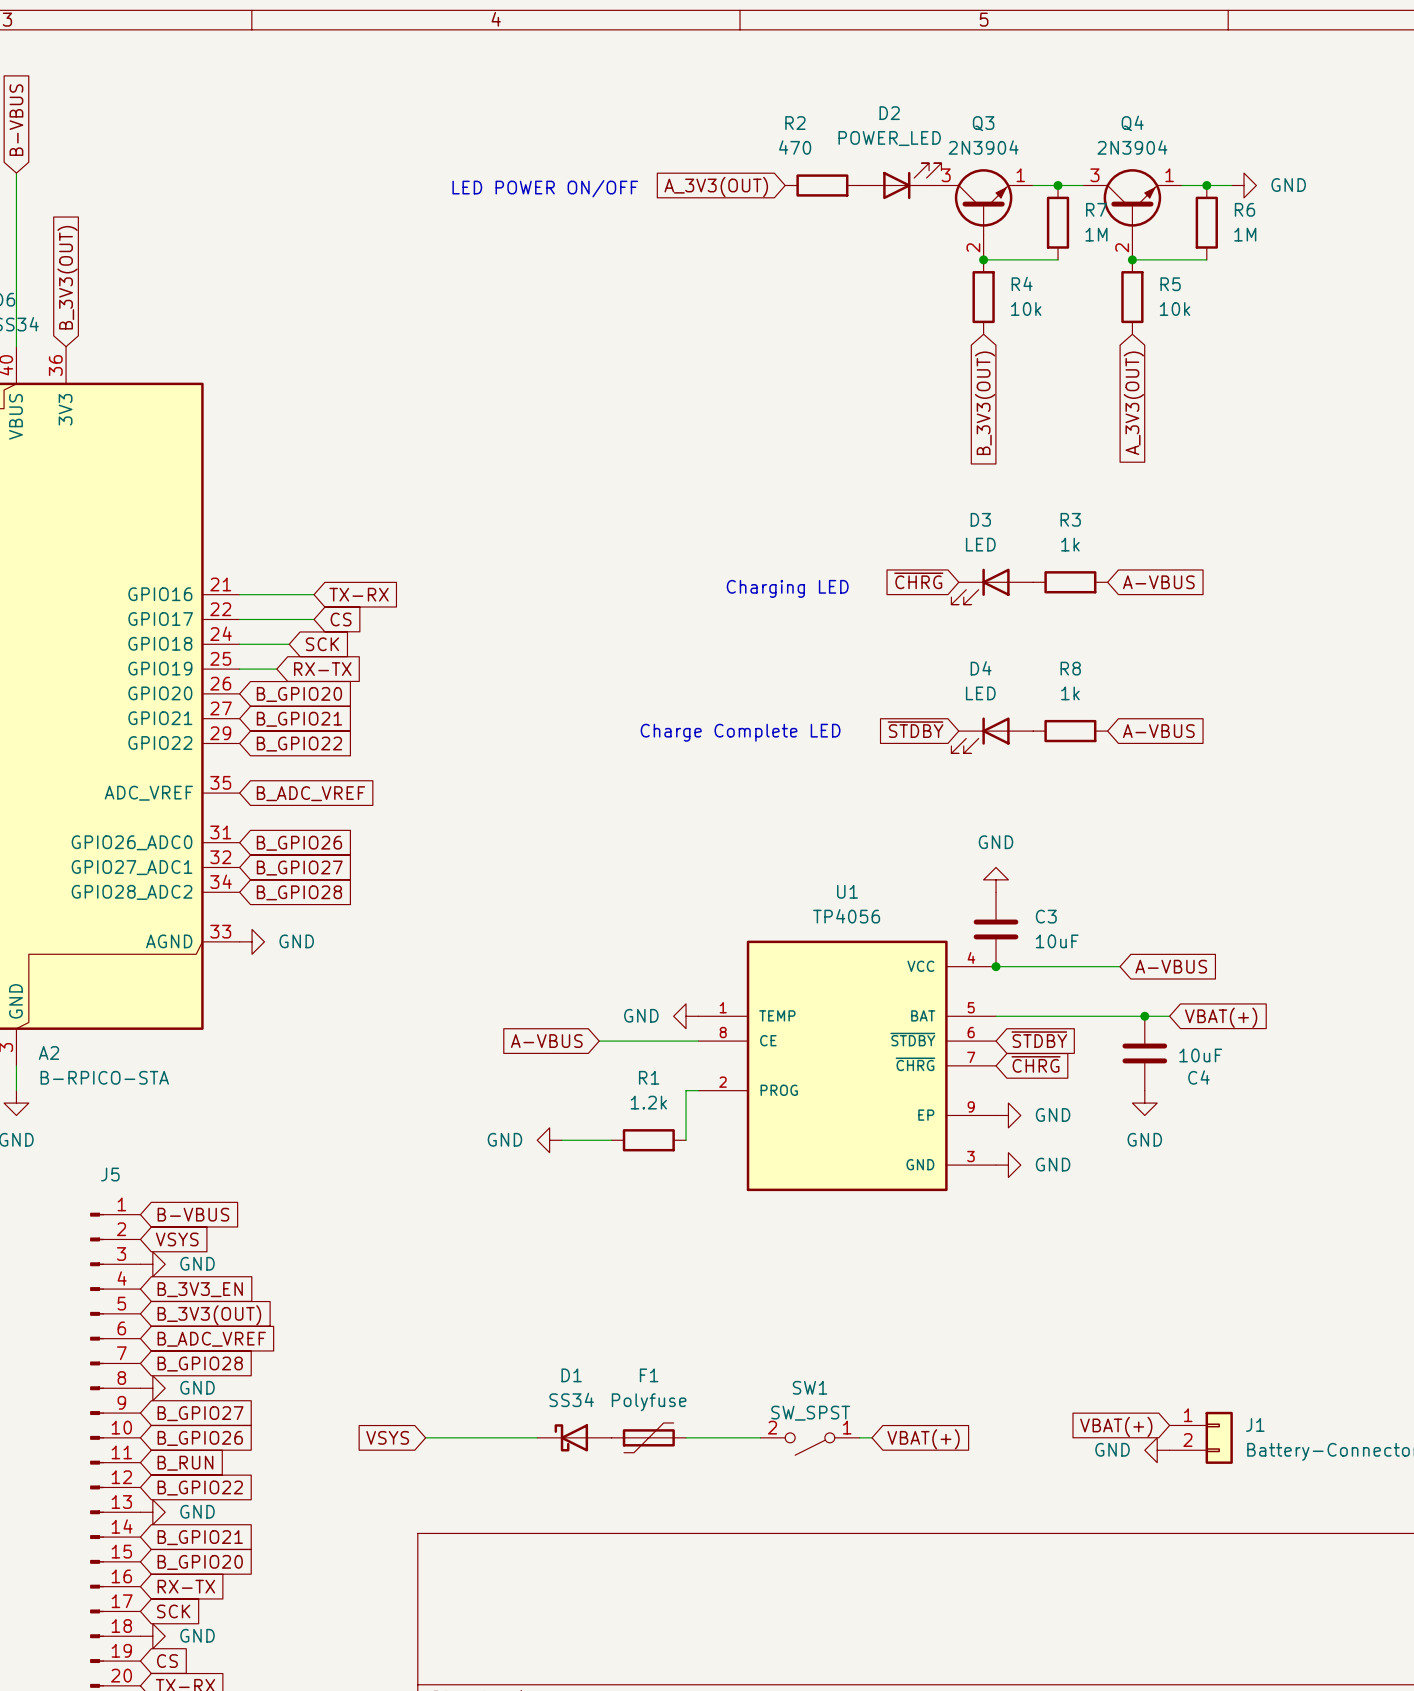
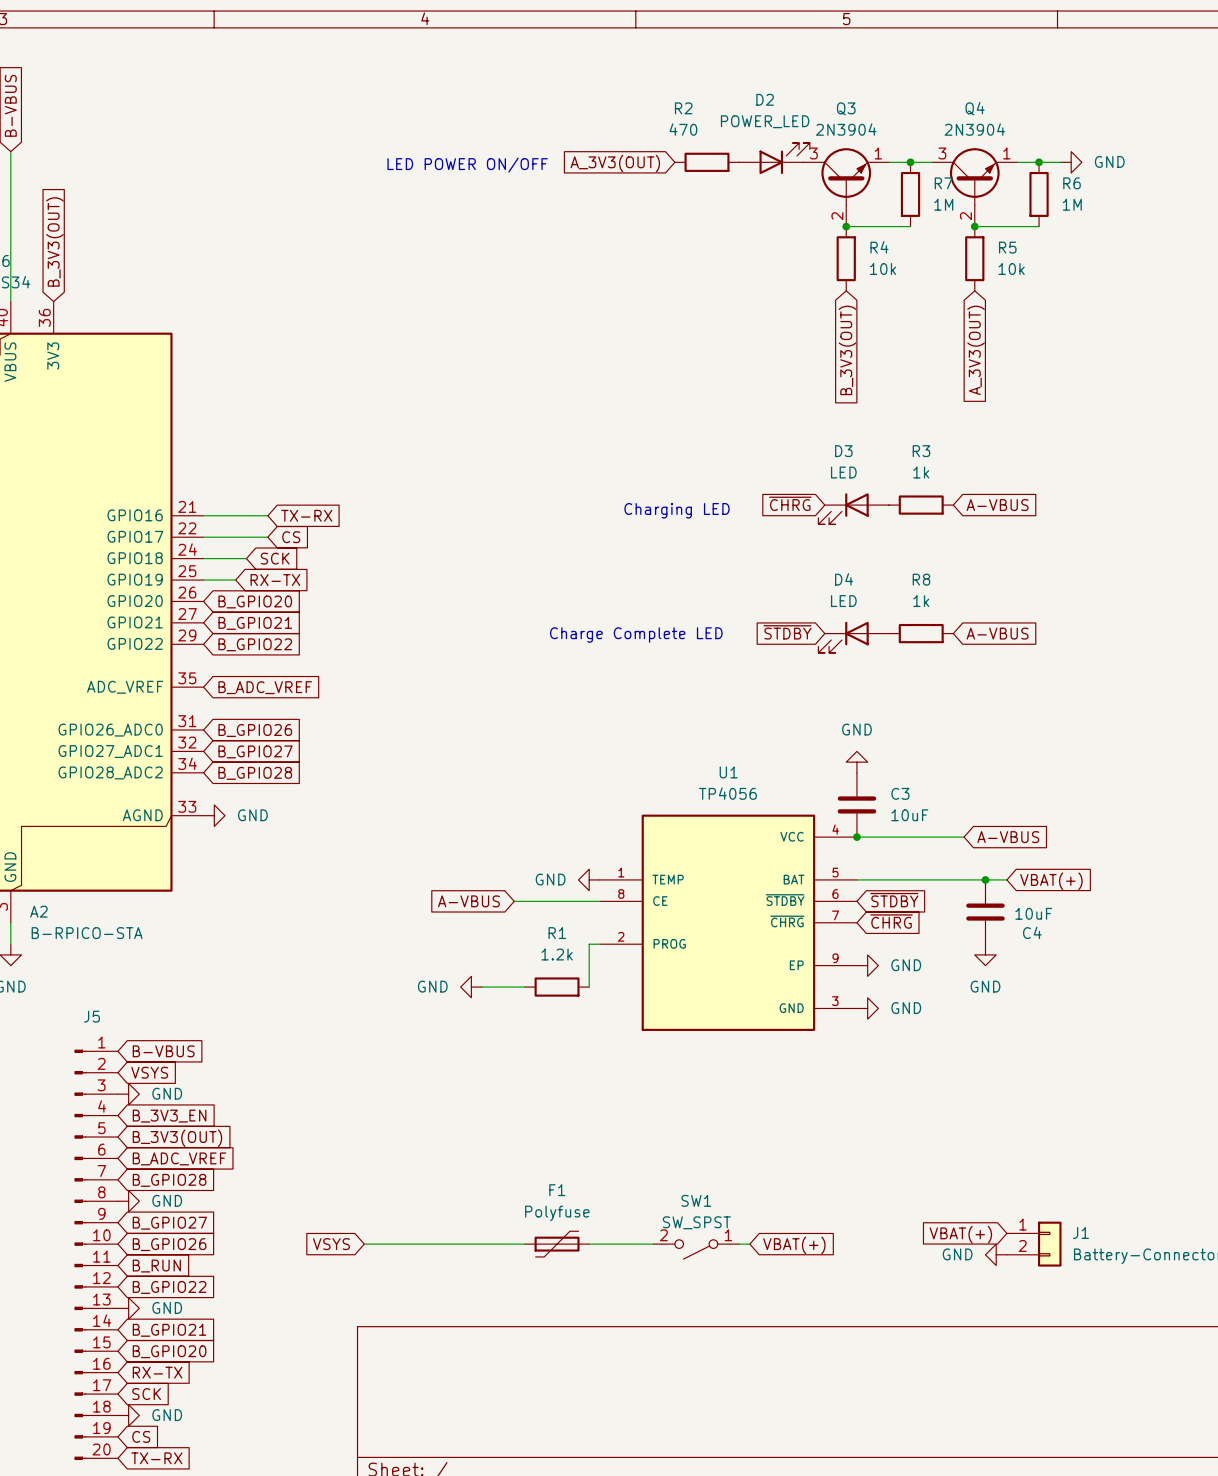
D1: SS34 (574, 1437) -> none

